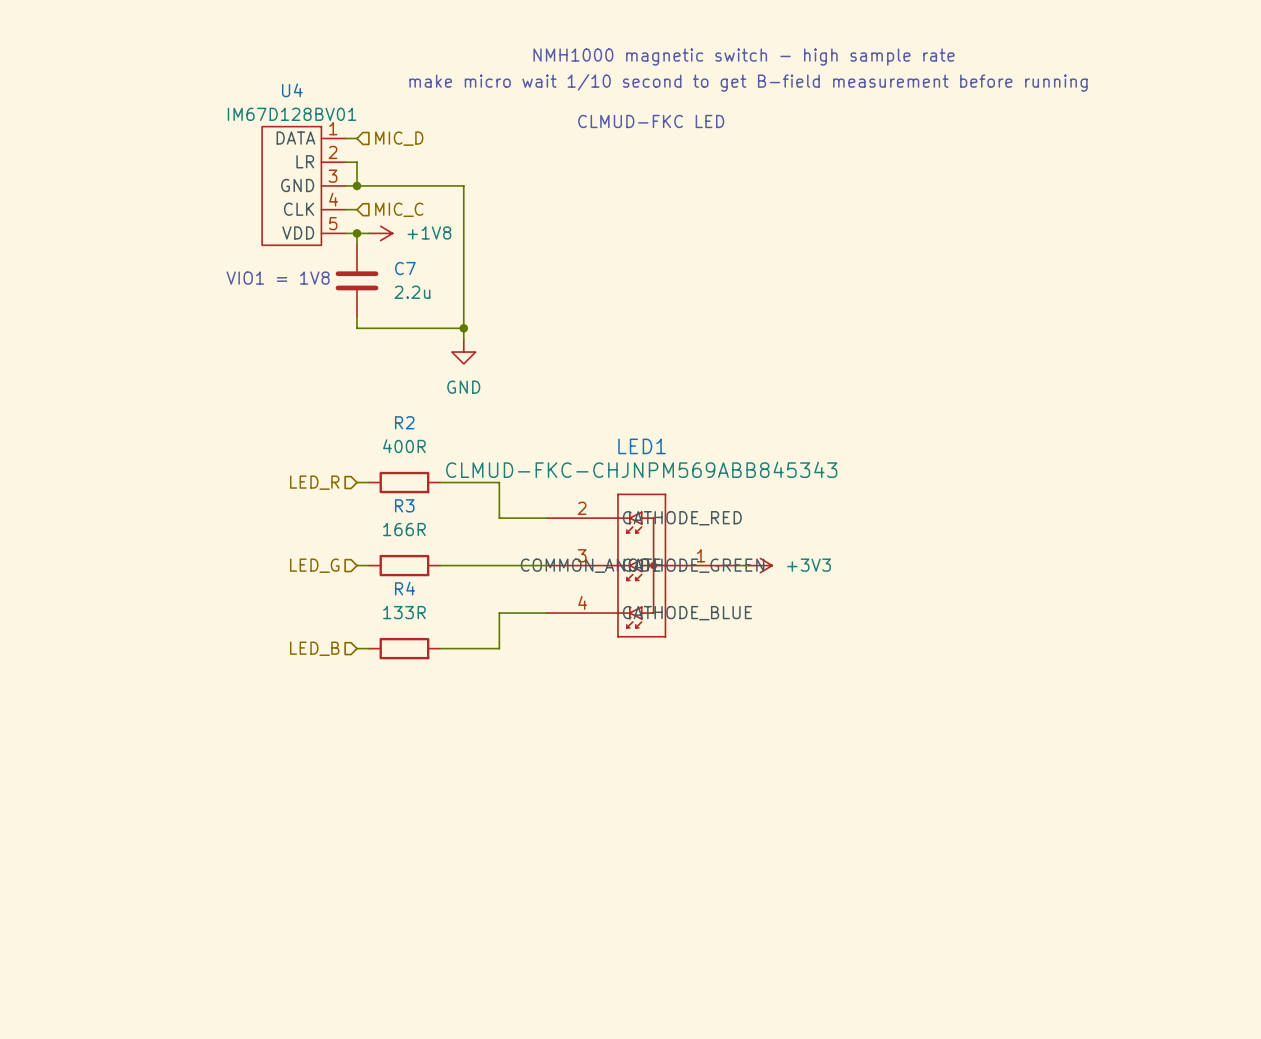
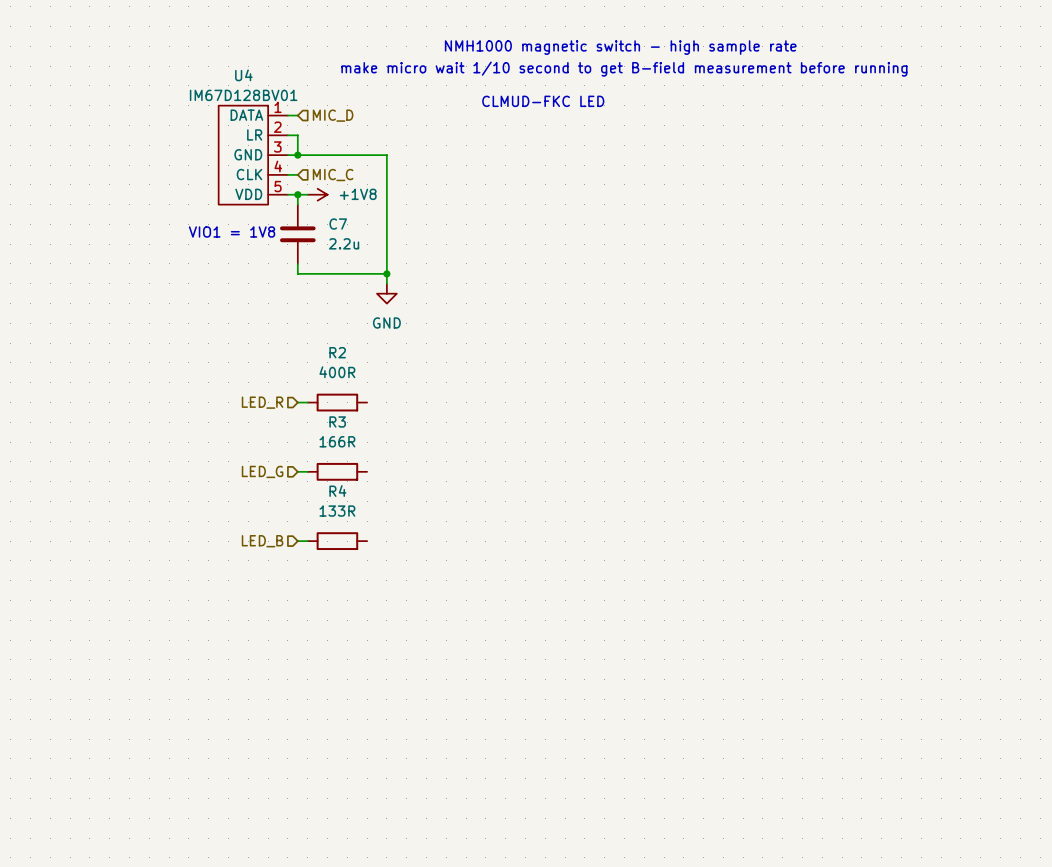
wire: (440, 482) (499, 482) (499, 518) (546, 518) -> none
wire: (440, 565) (546, 565) -> none
LED1: CLMUD-FKC-CHJNPM569ABB845343 (641, 565) -> none
wire: (736, 565) (748, 565) -> none
power symbol: +3V3 (760, 565) -> none
wire: (546, 613) (499, 613) (499, 648) (440, 648) -> none

